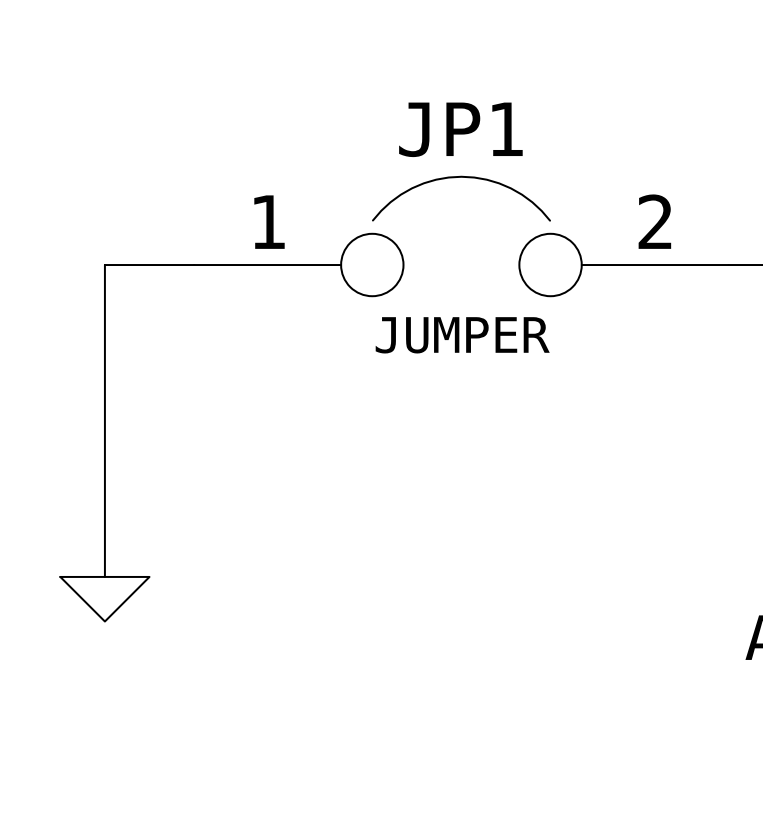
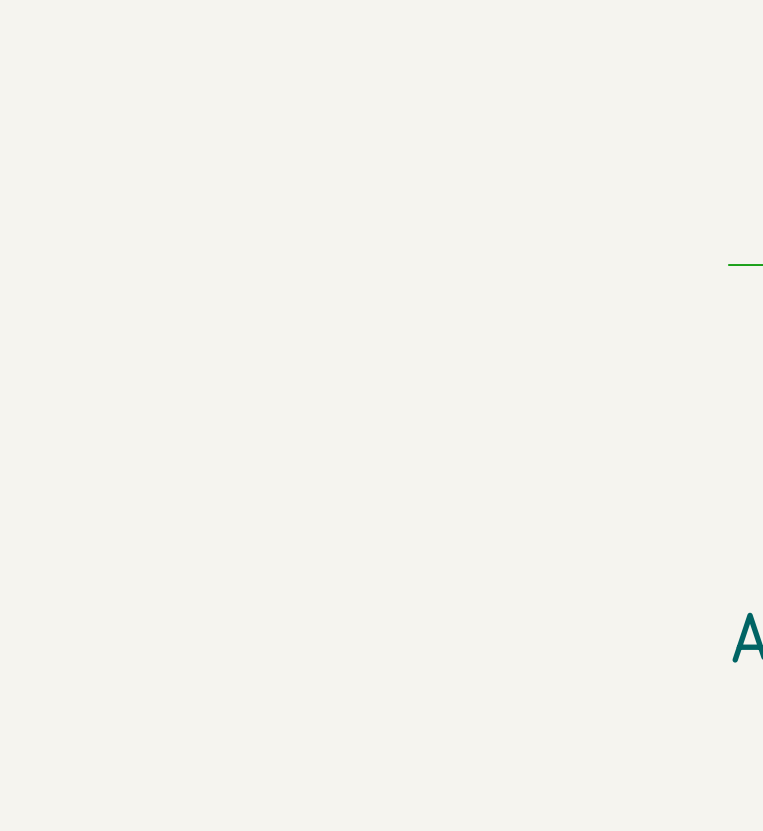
JP1: JUMPER (461, 236) -> none
wire: (194, 265) (104, 265) (104, 576) -> none
power symbol: (104, 599) -> none

